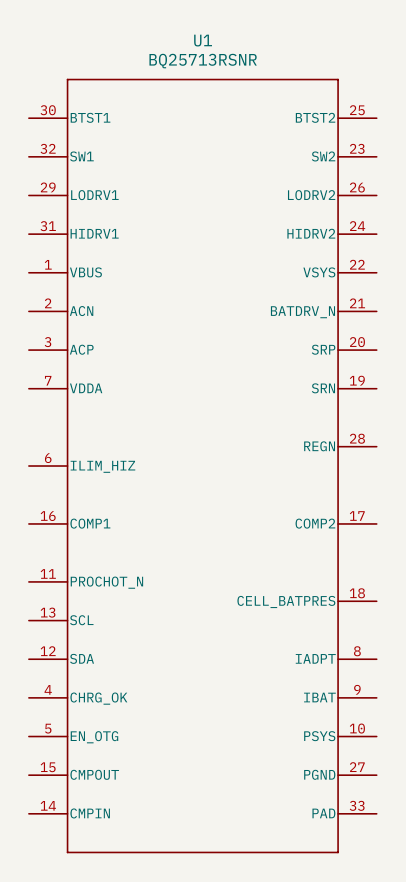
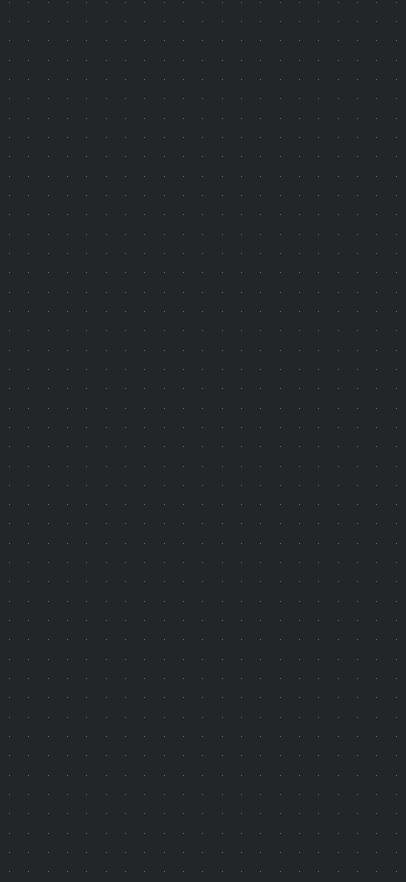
U1: BQ25713RSNR (202, 466) -> none

